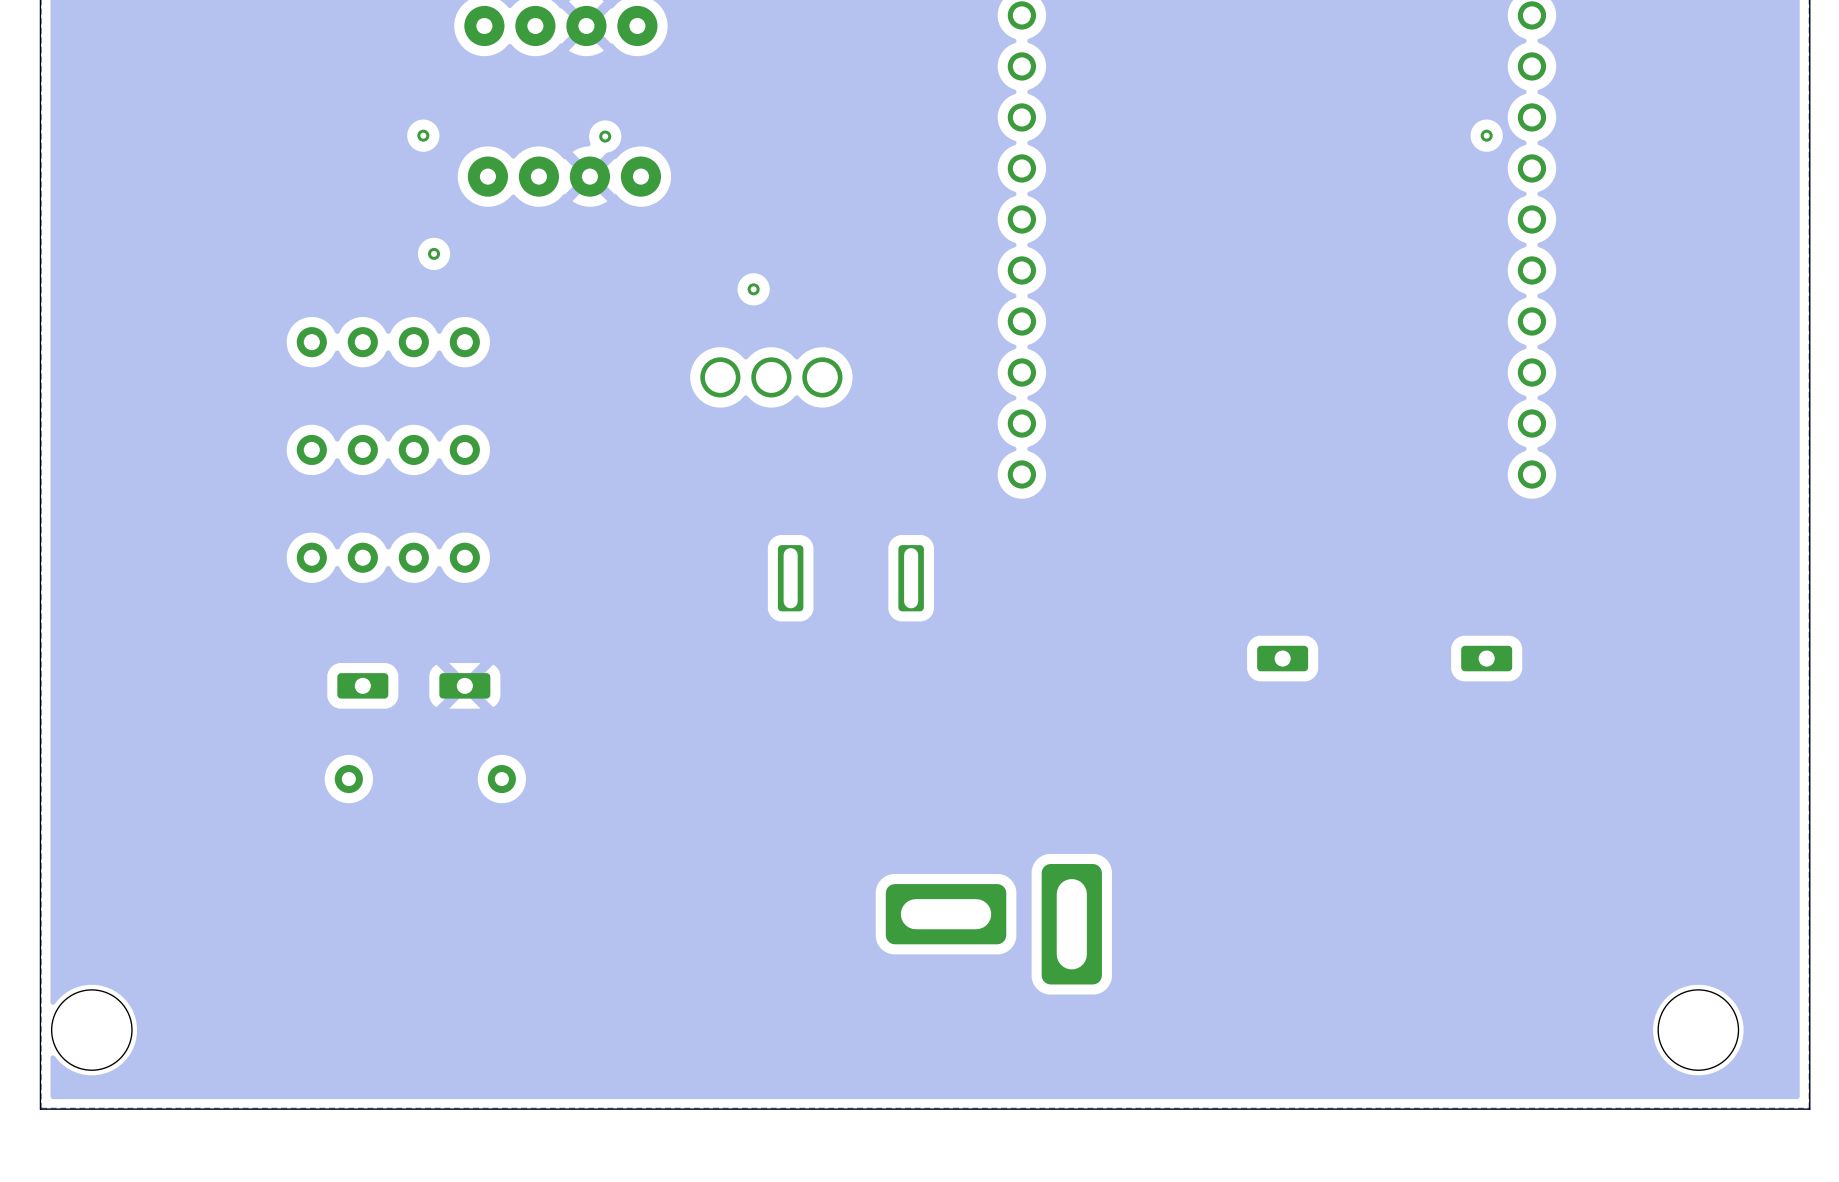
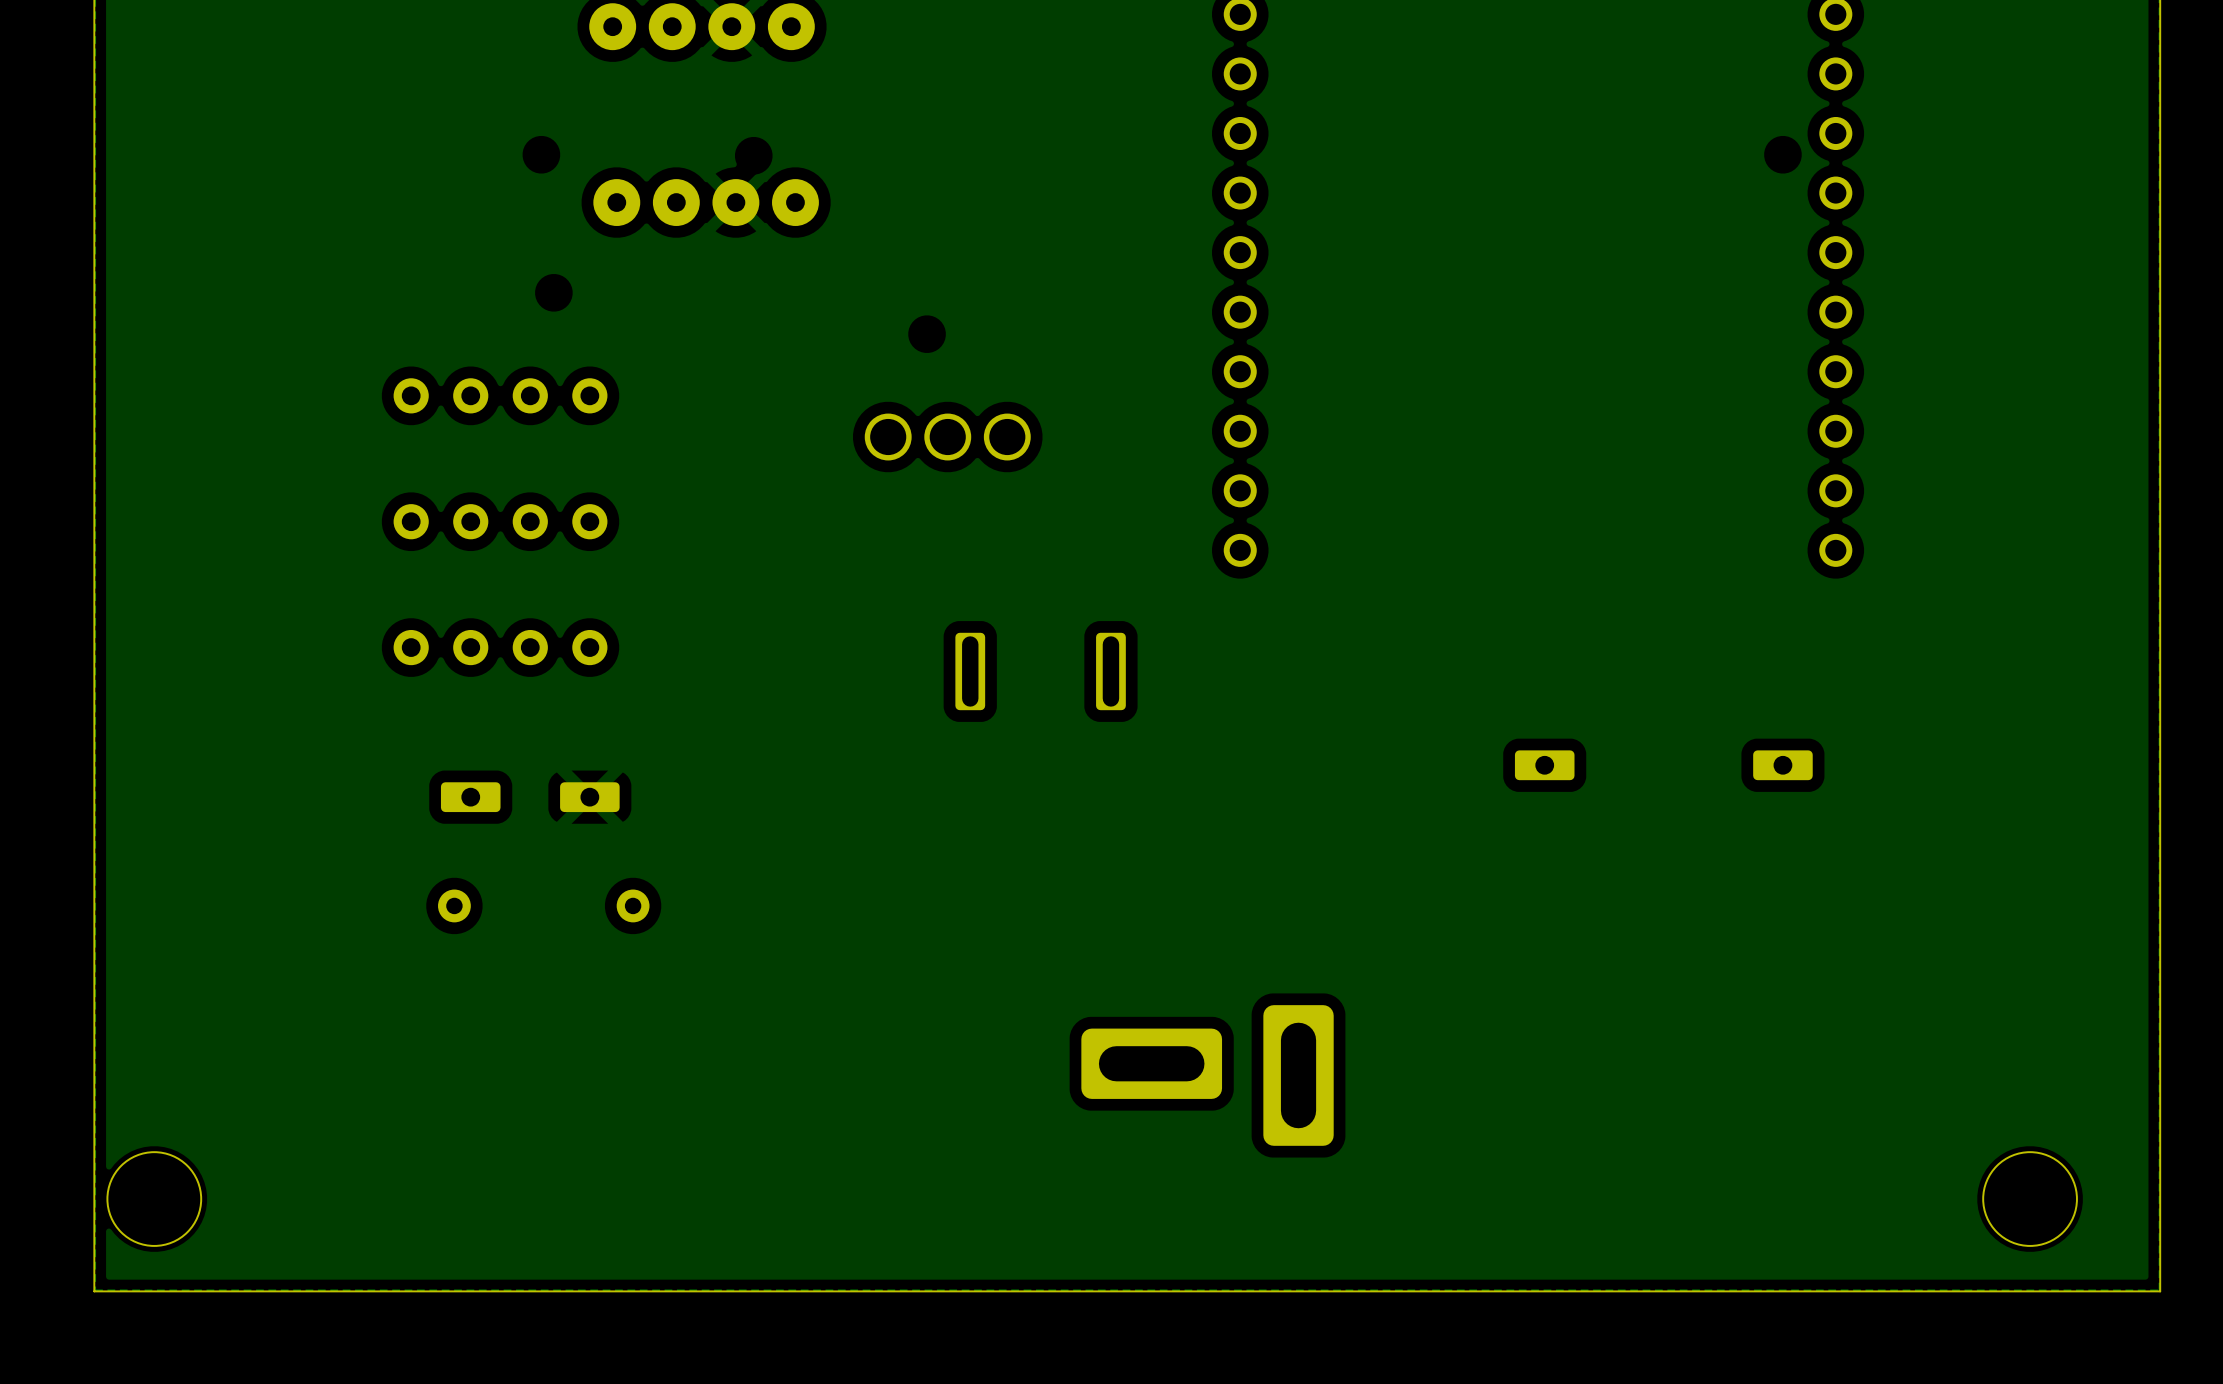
via: (423, 135) -> none
via: (1486, 135) -> none
via: (605, 136) -> none
via: (434, 253) -> none
via: (753, 289) -> none

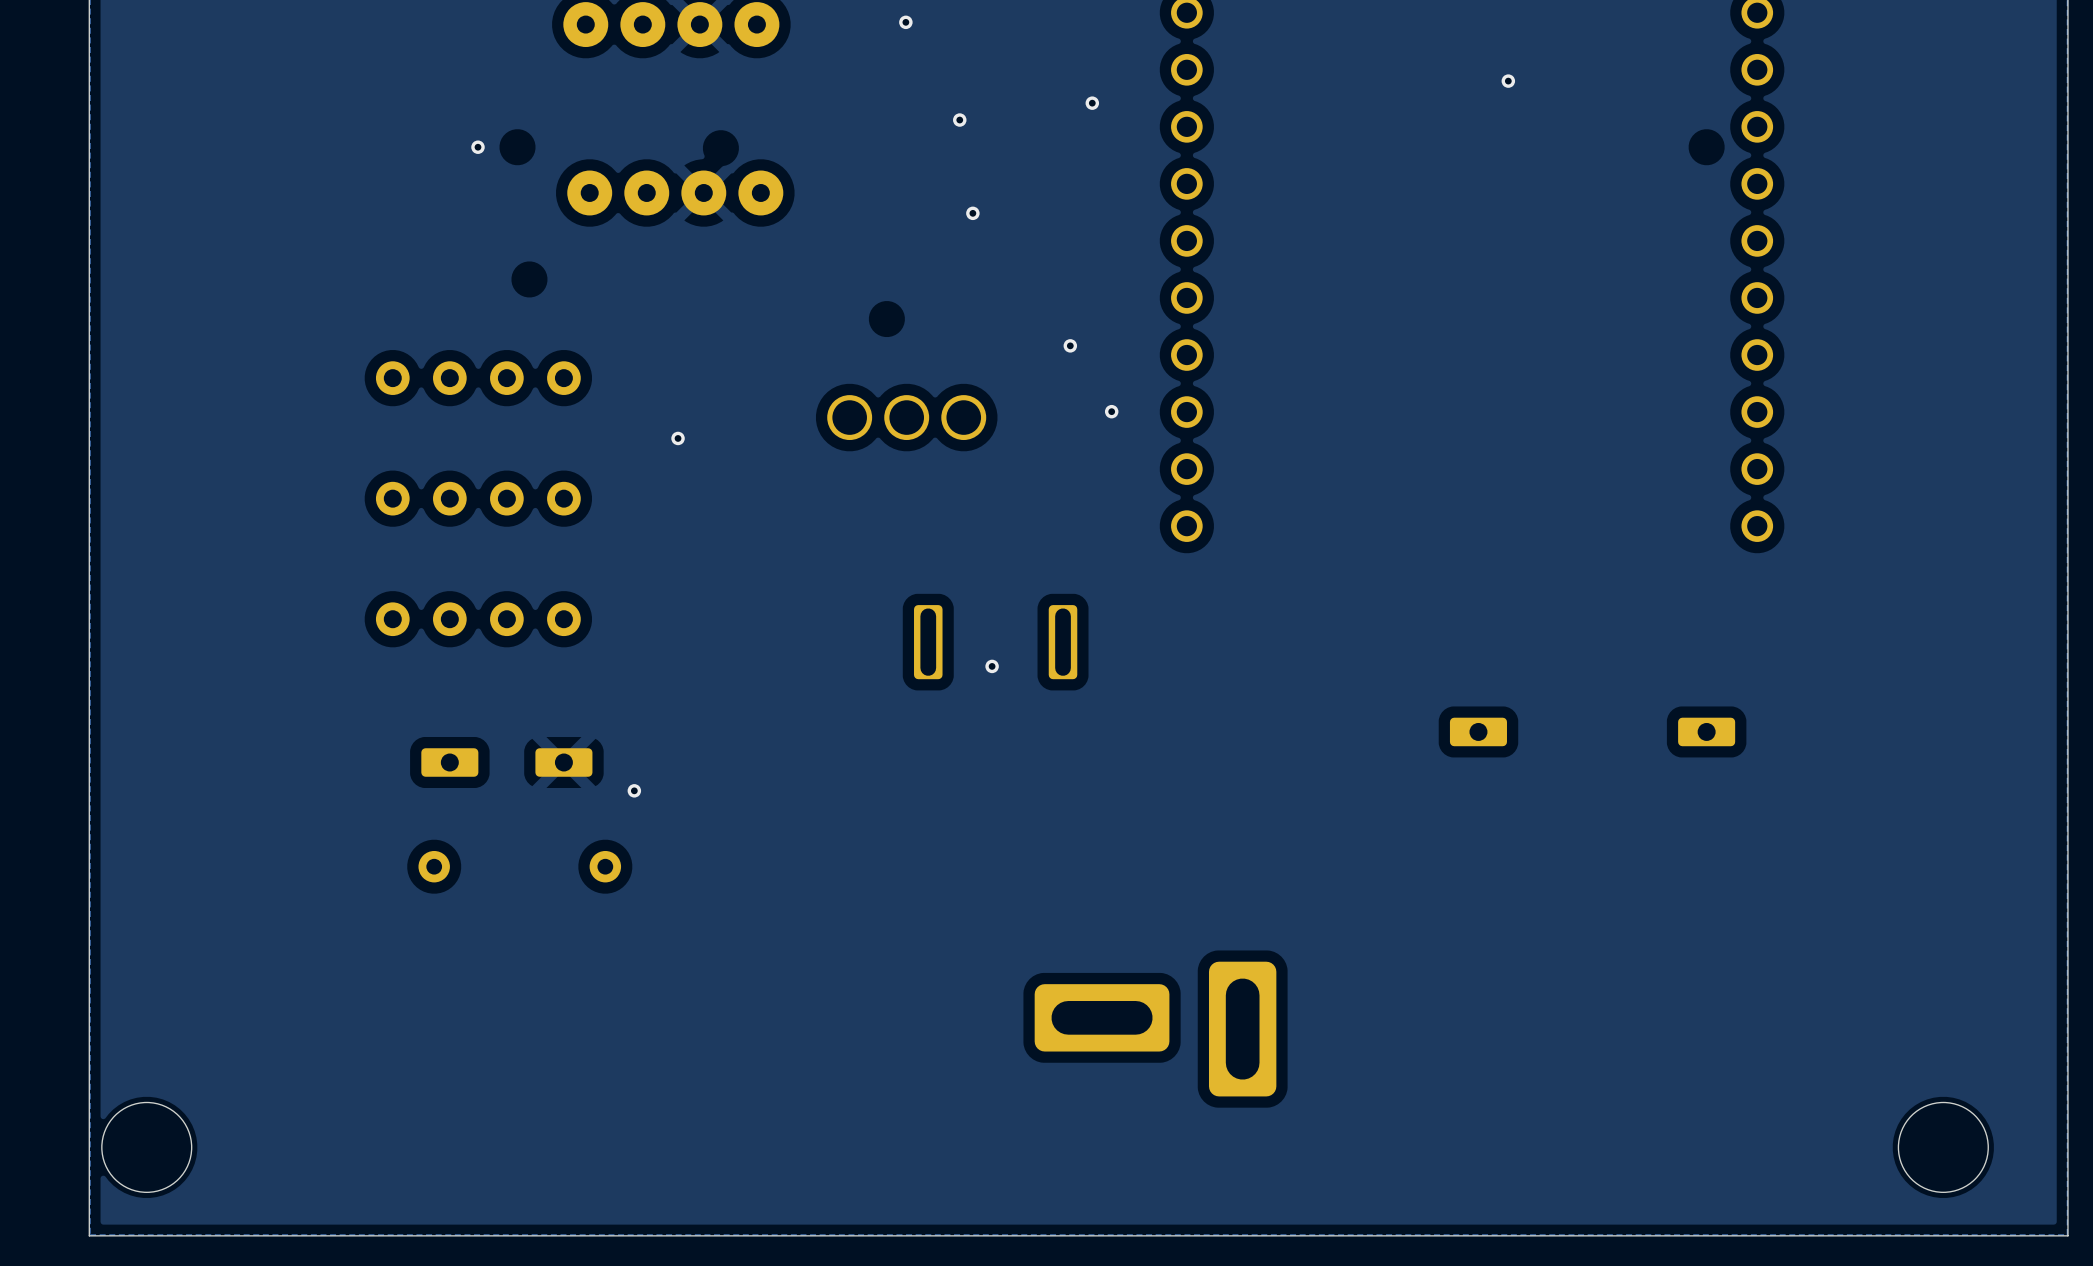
via: none -> (905, 22)
via: none -> (1508, 81)
via: none -> (1092, 103)
via: none -> (959, 120)
via: none -> (478, 147)
via: none -> (972, 213)
via: none -> (1070, 345)
via: none -> (1111, 411)
via: none -> (678, 438)
via: none -> (992, 666)
via: none -> (634, 790)

